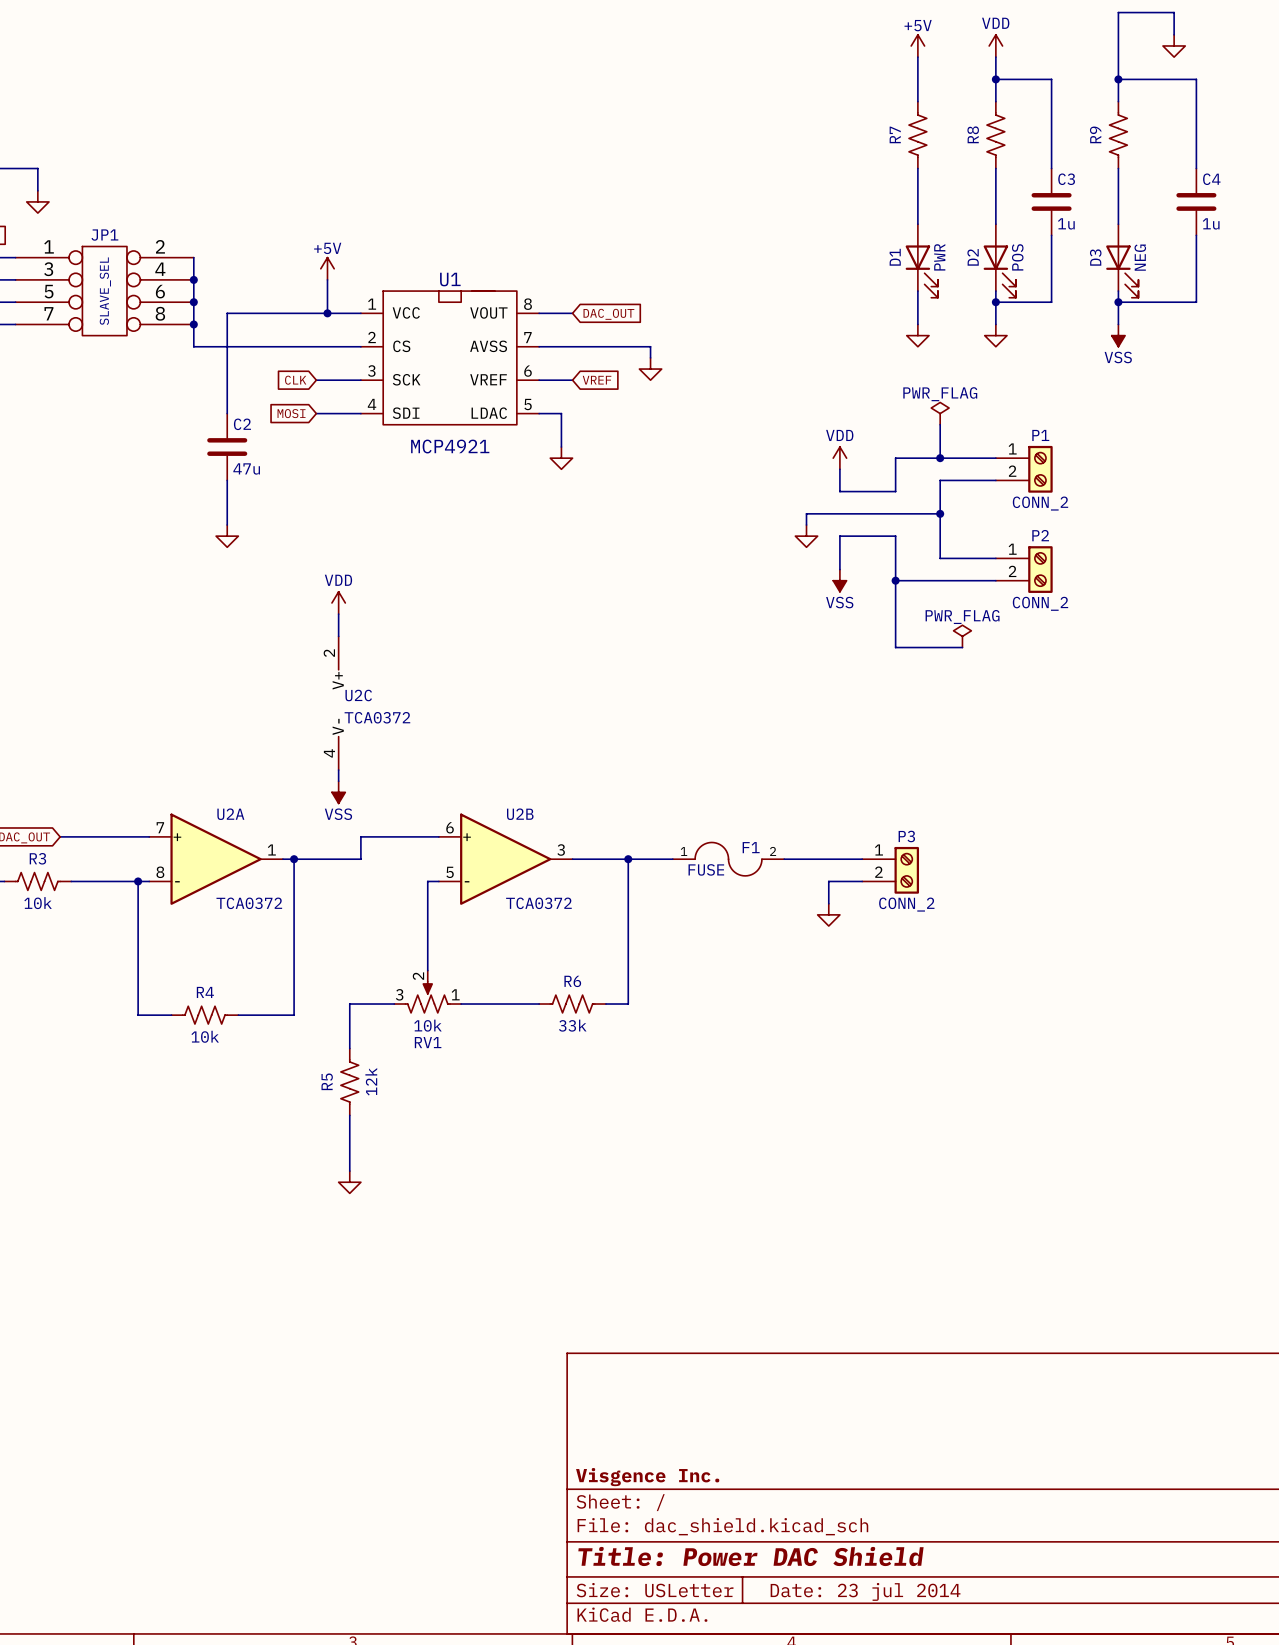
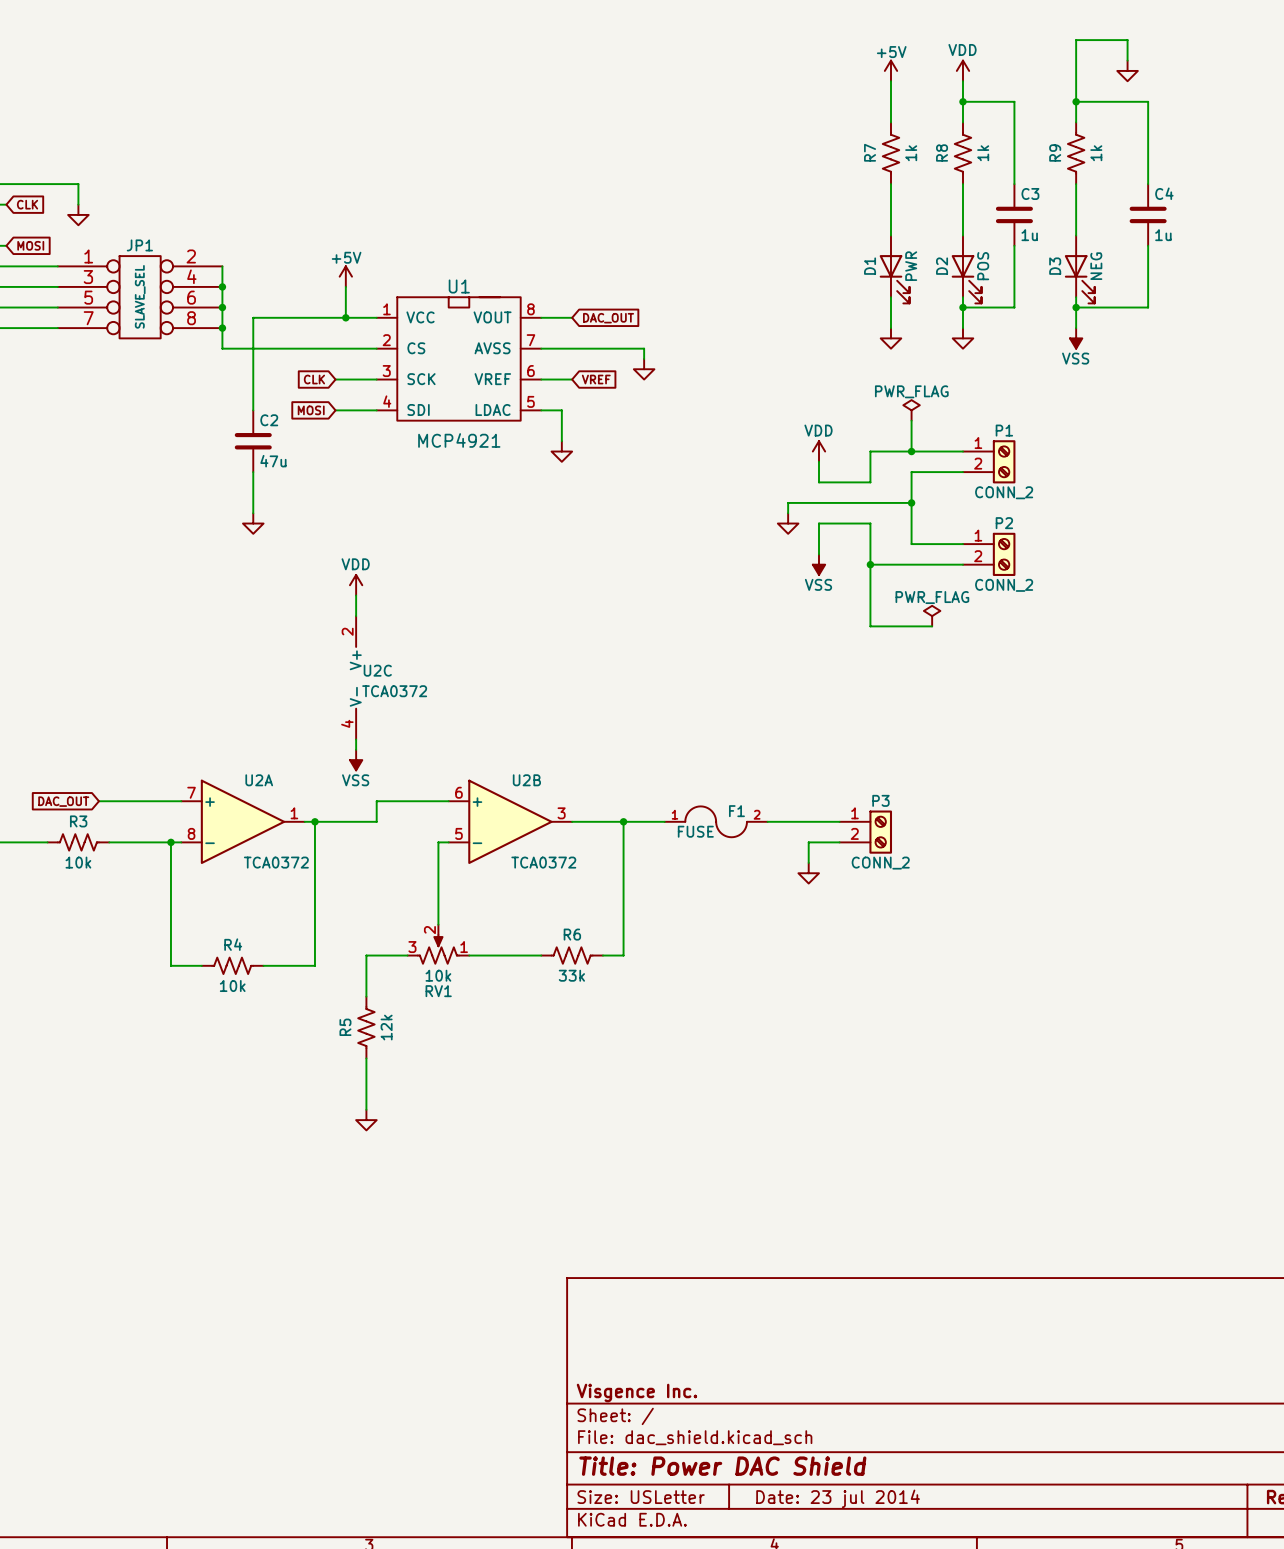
R7 value: none -> 1k (911, 153)
R8 value: none -> 1k (983, 153)
R9 value: none -> 1k (1096, 153)

